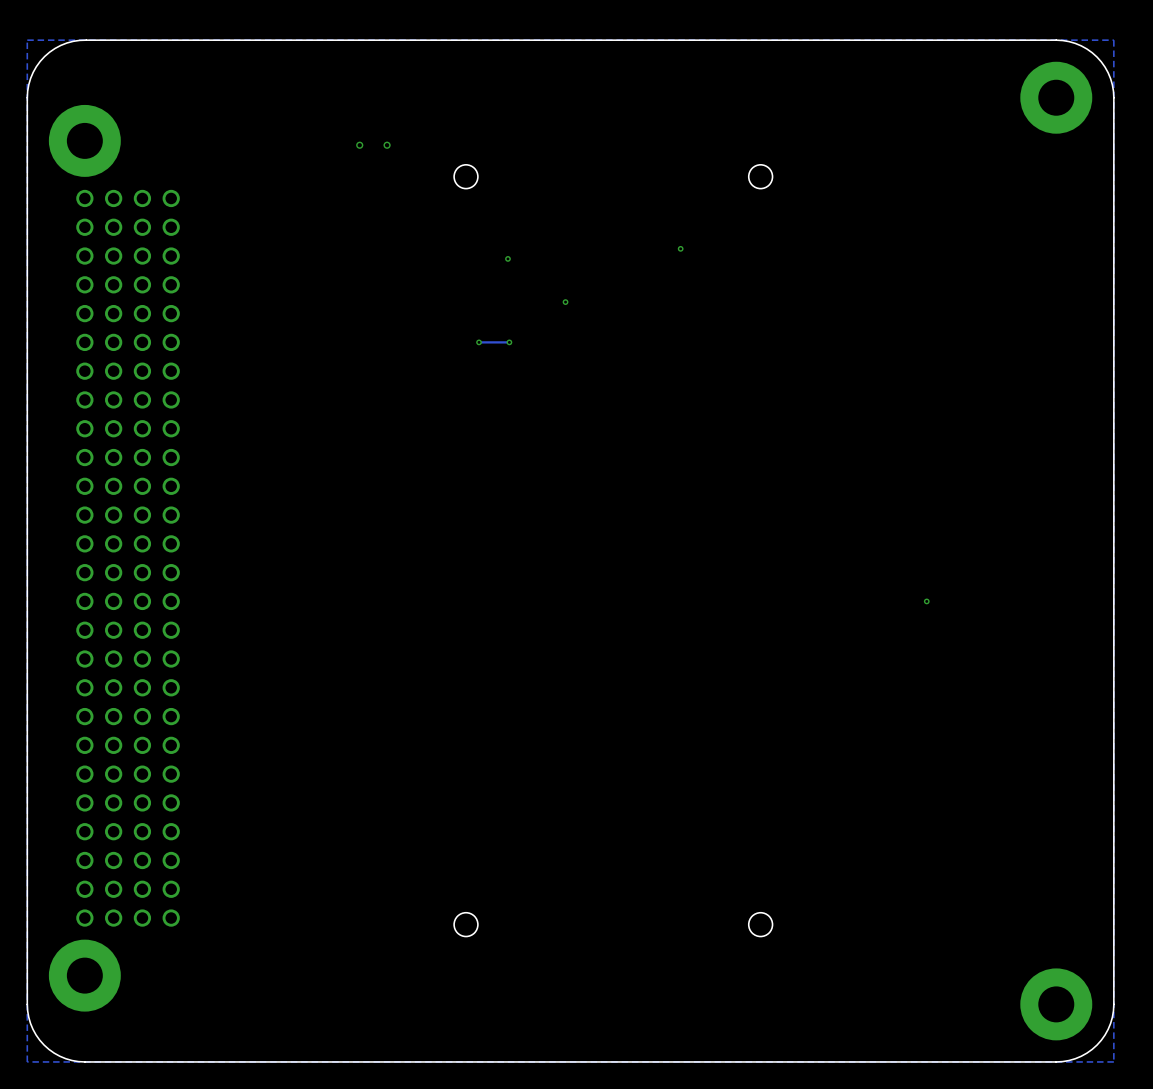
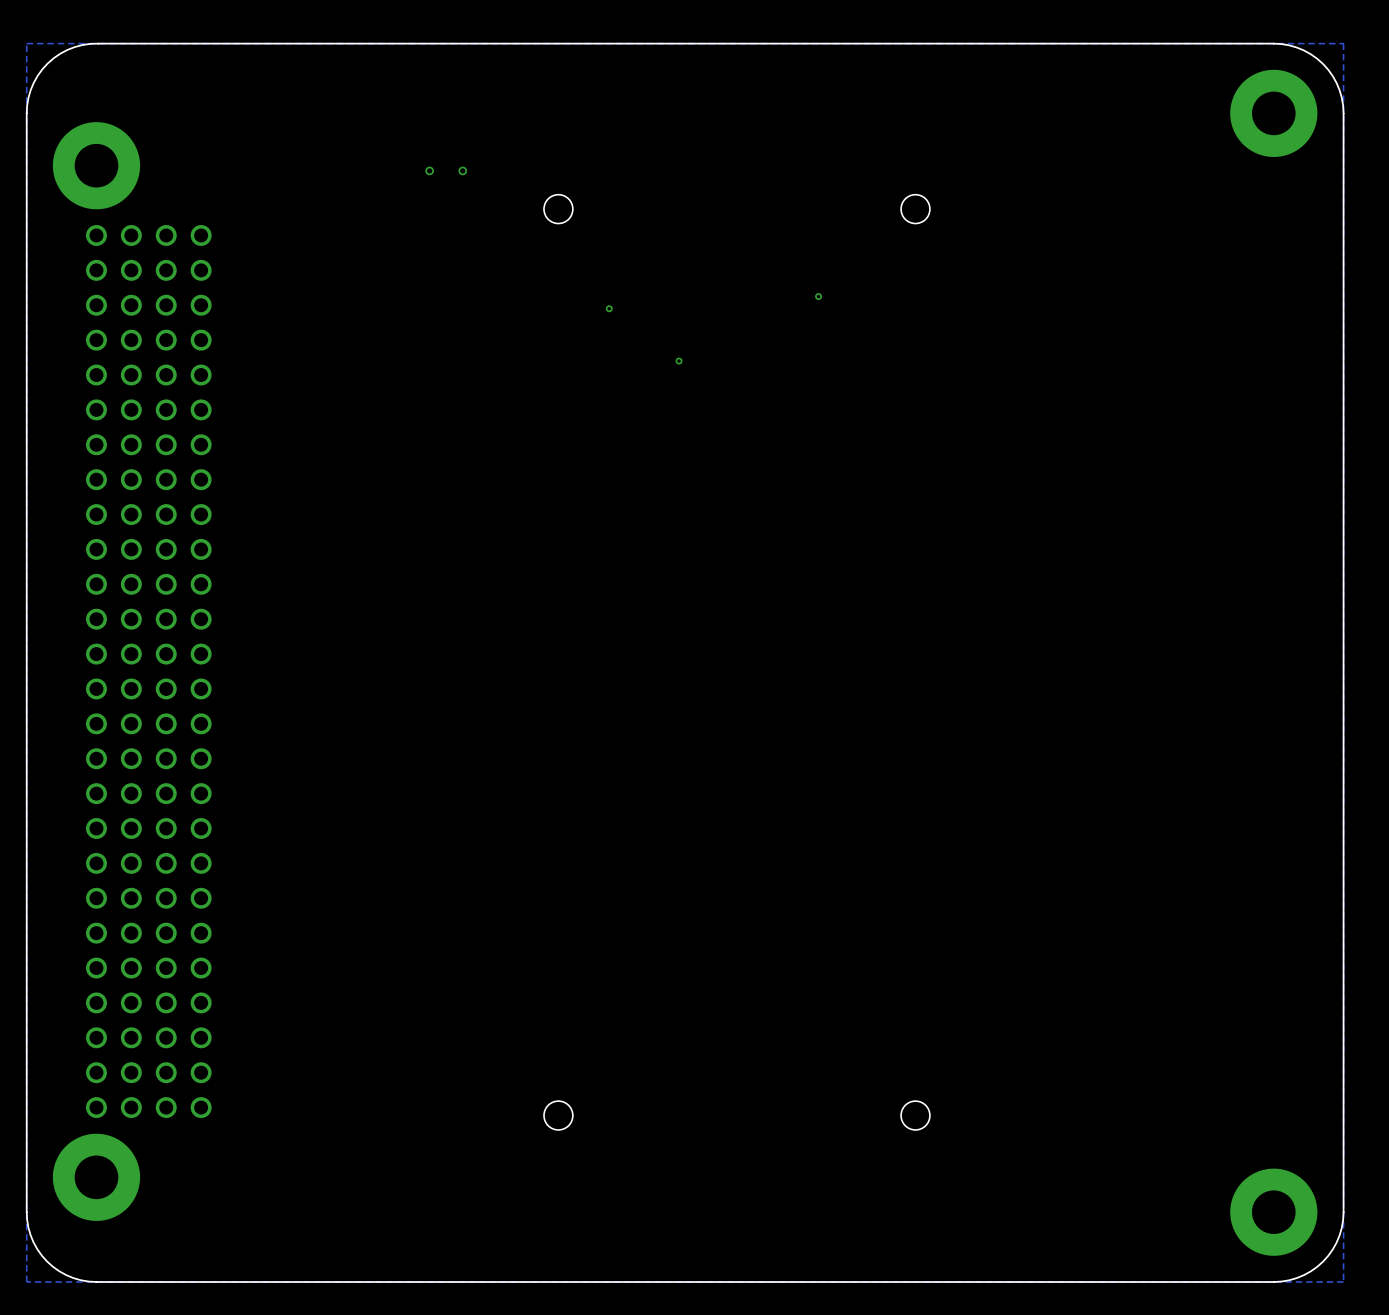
via: (479, 342) -> none
track: (509, 342) (479, 342) -> none
via: (509, 342) -> none
via: (926, 601) -> none

